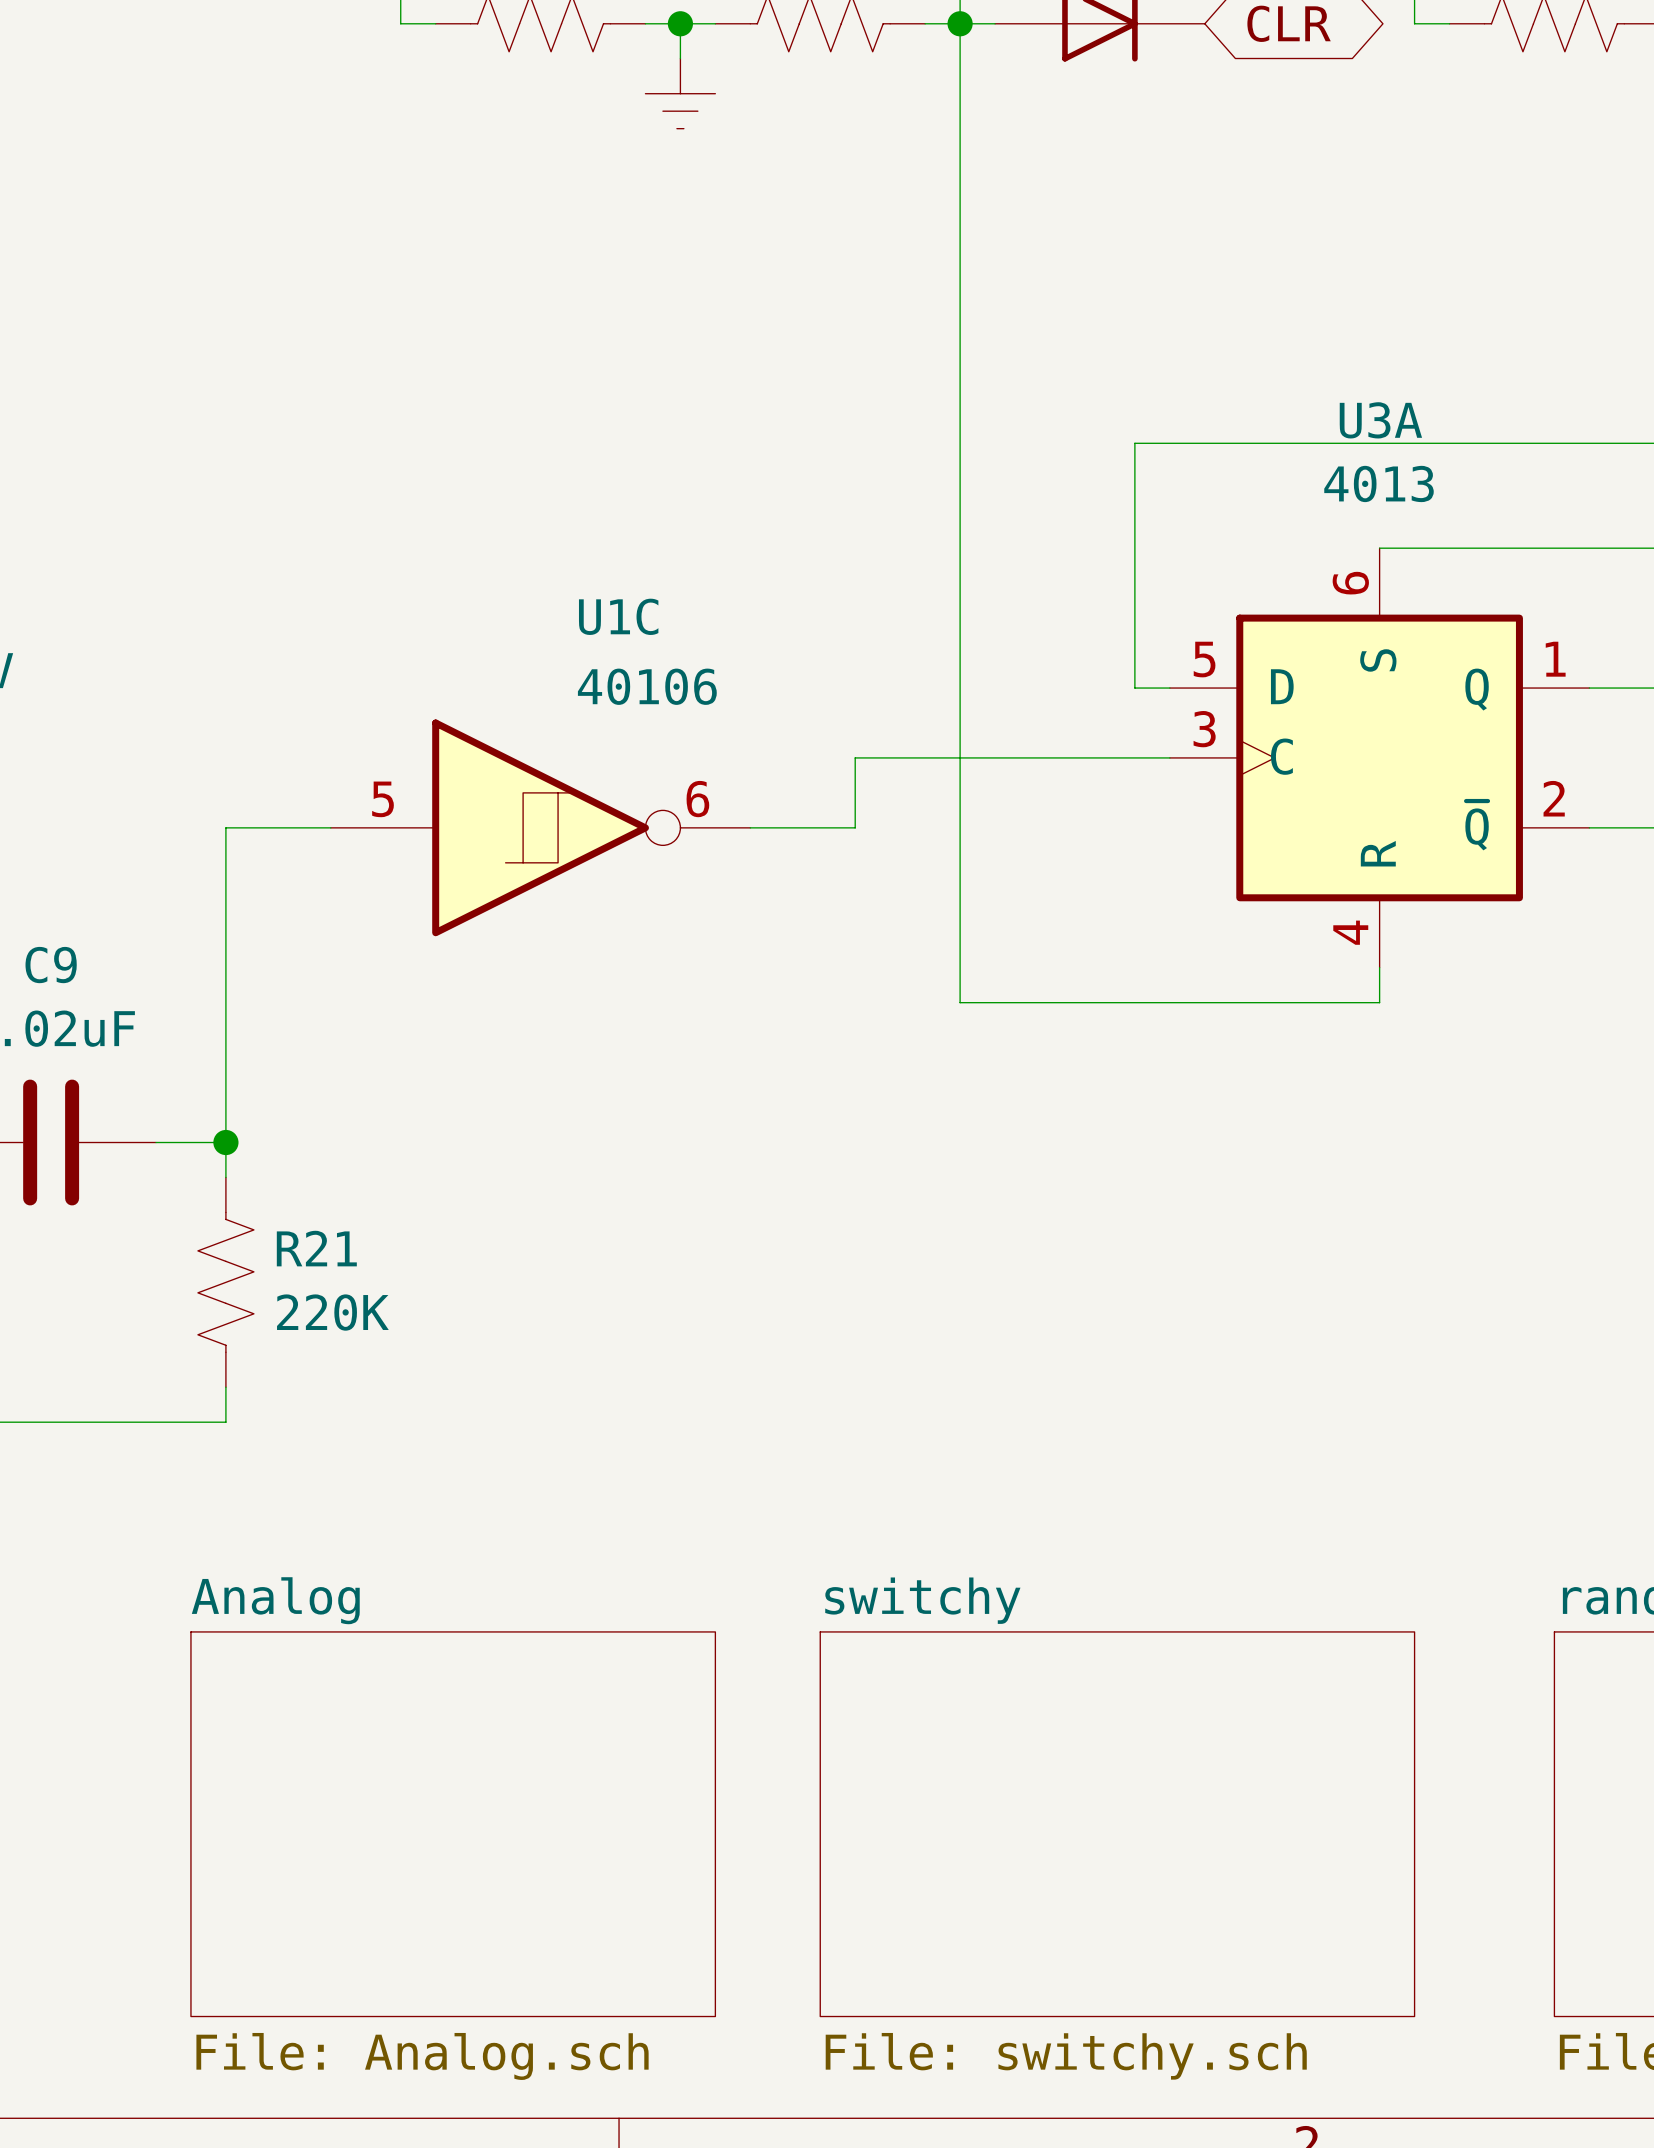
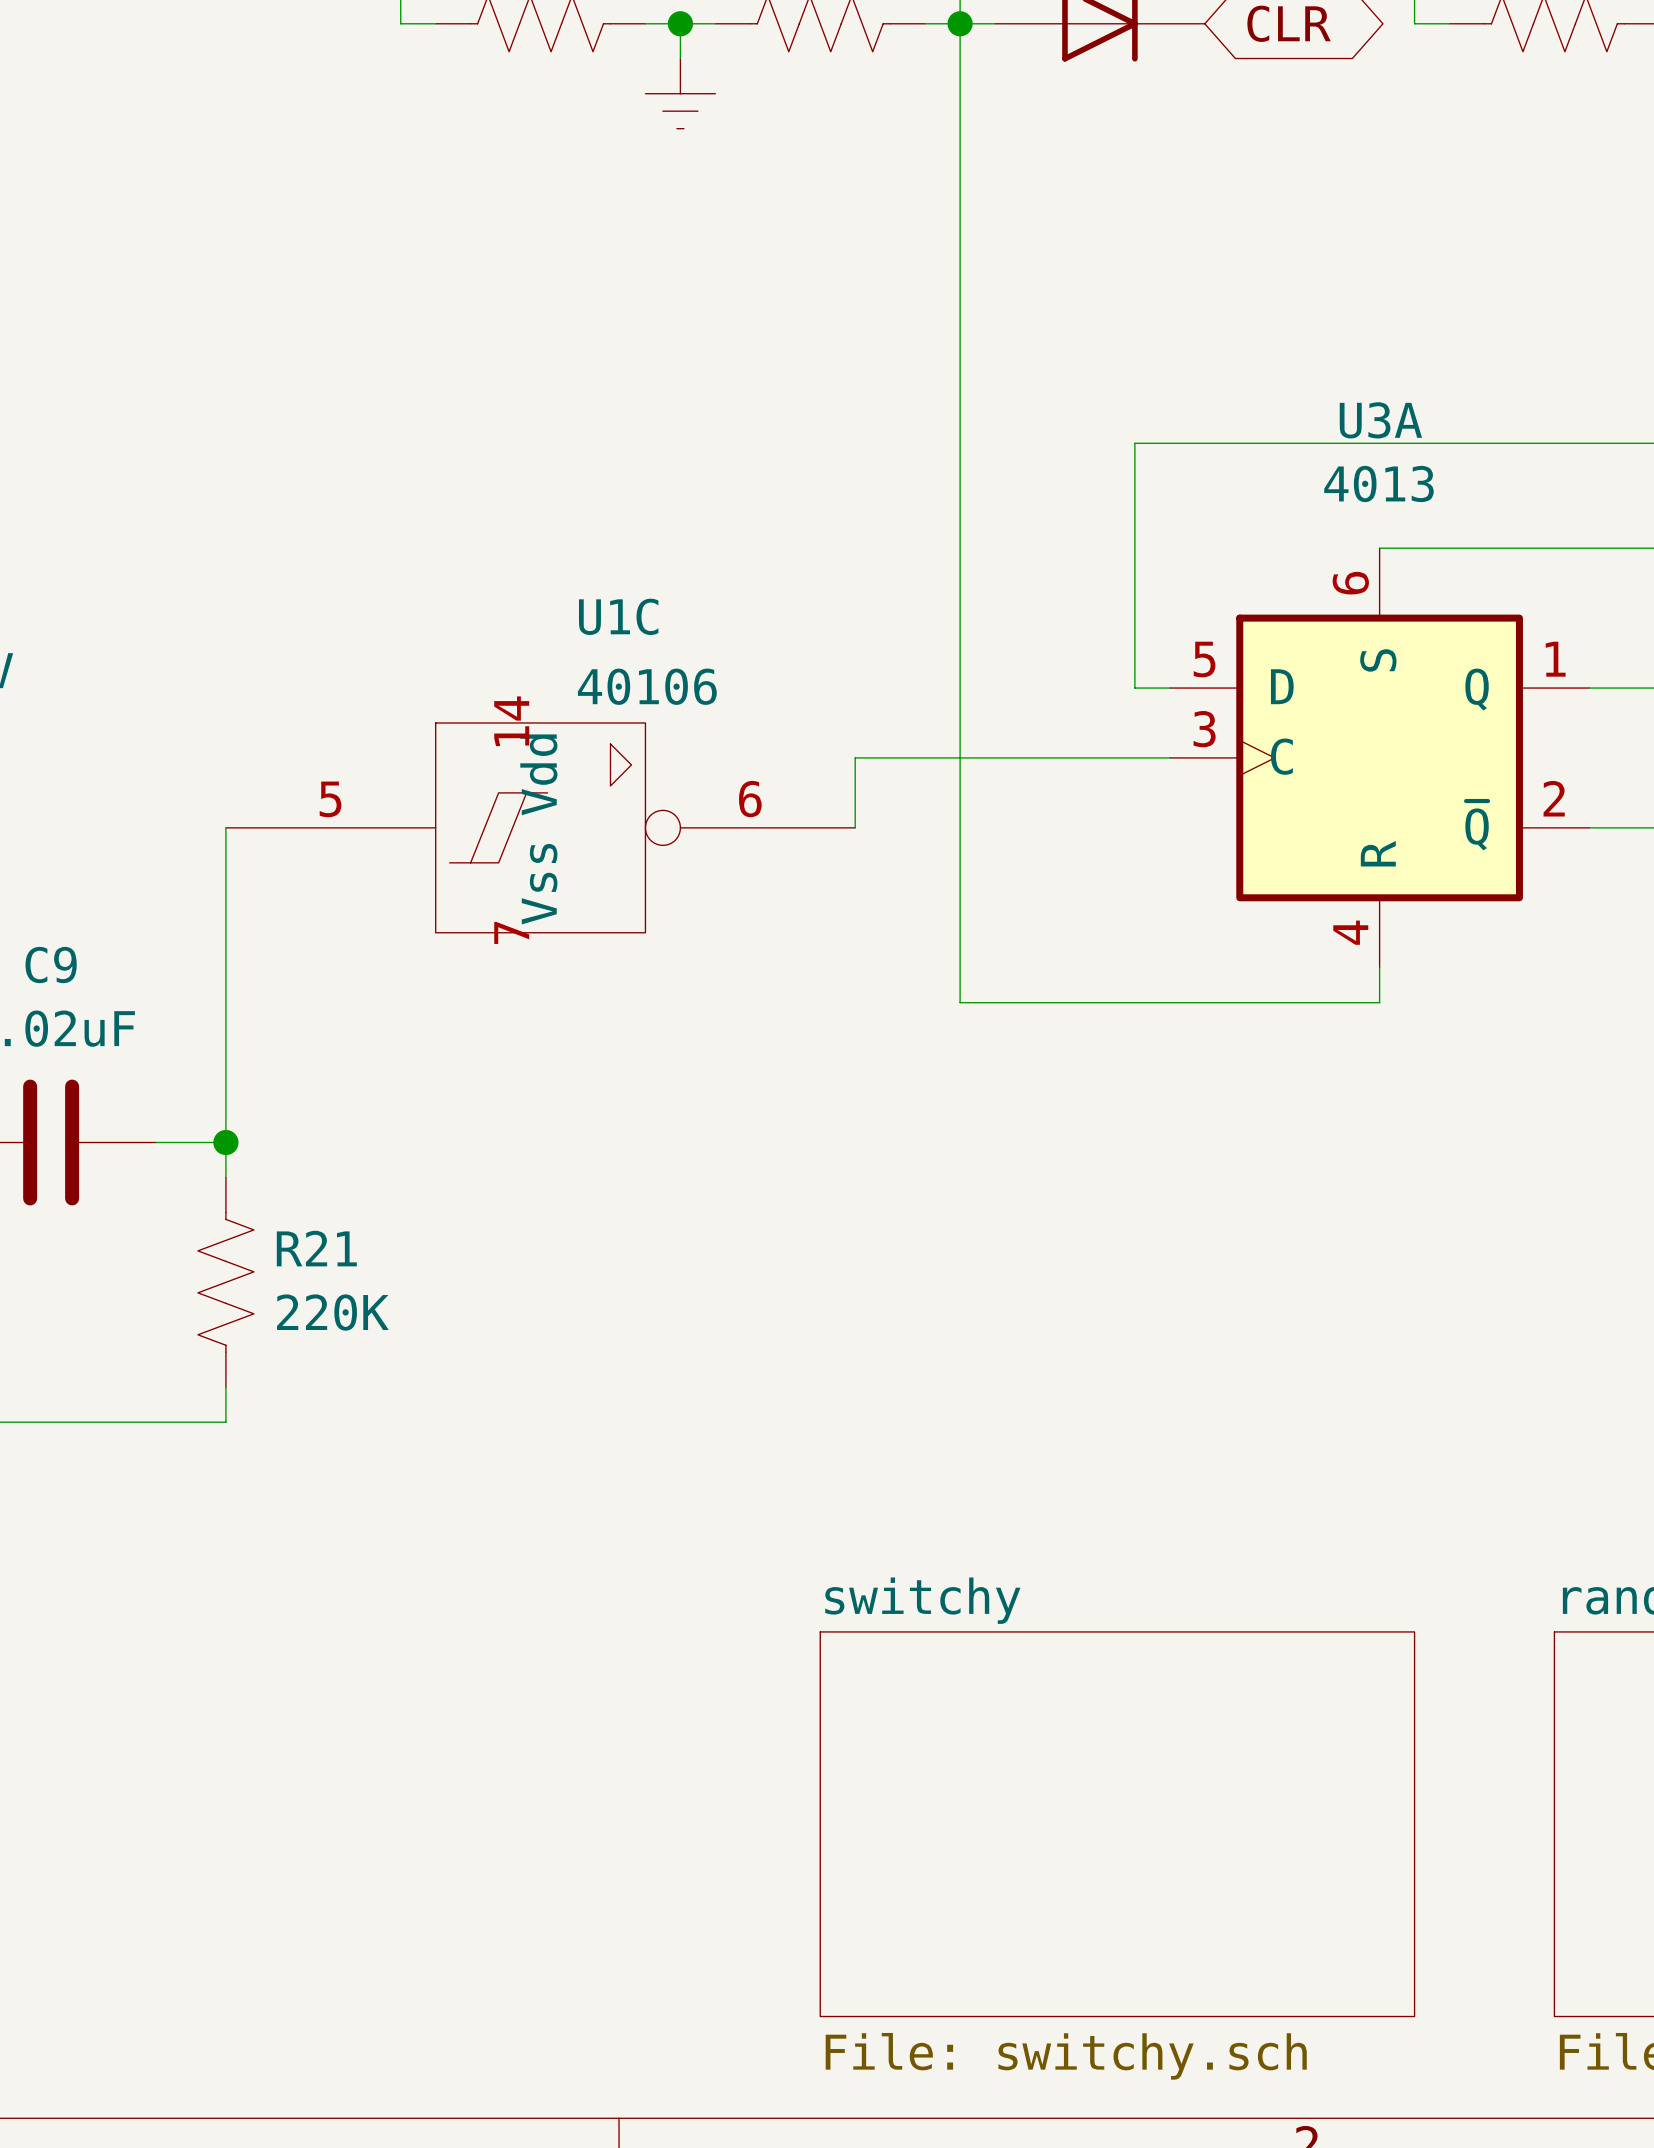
U1C symbol: [330, 719, 751, 937] -> [225, 722, 856, 933]
sheet Analog: File: Analog.sch (453, 1824) -> none

